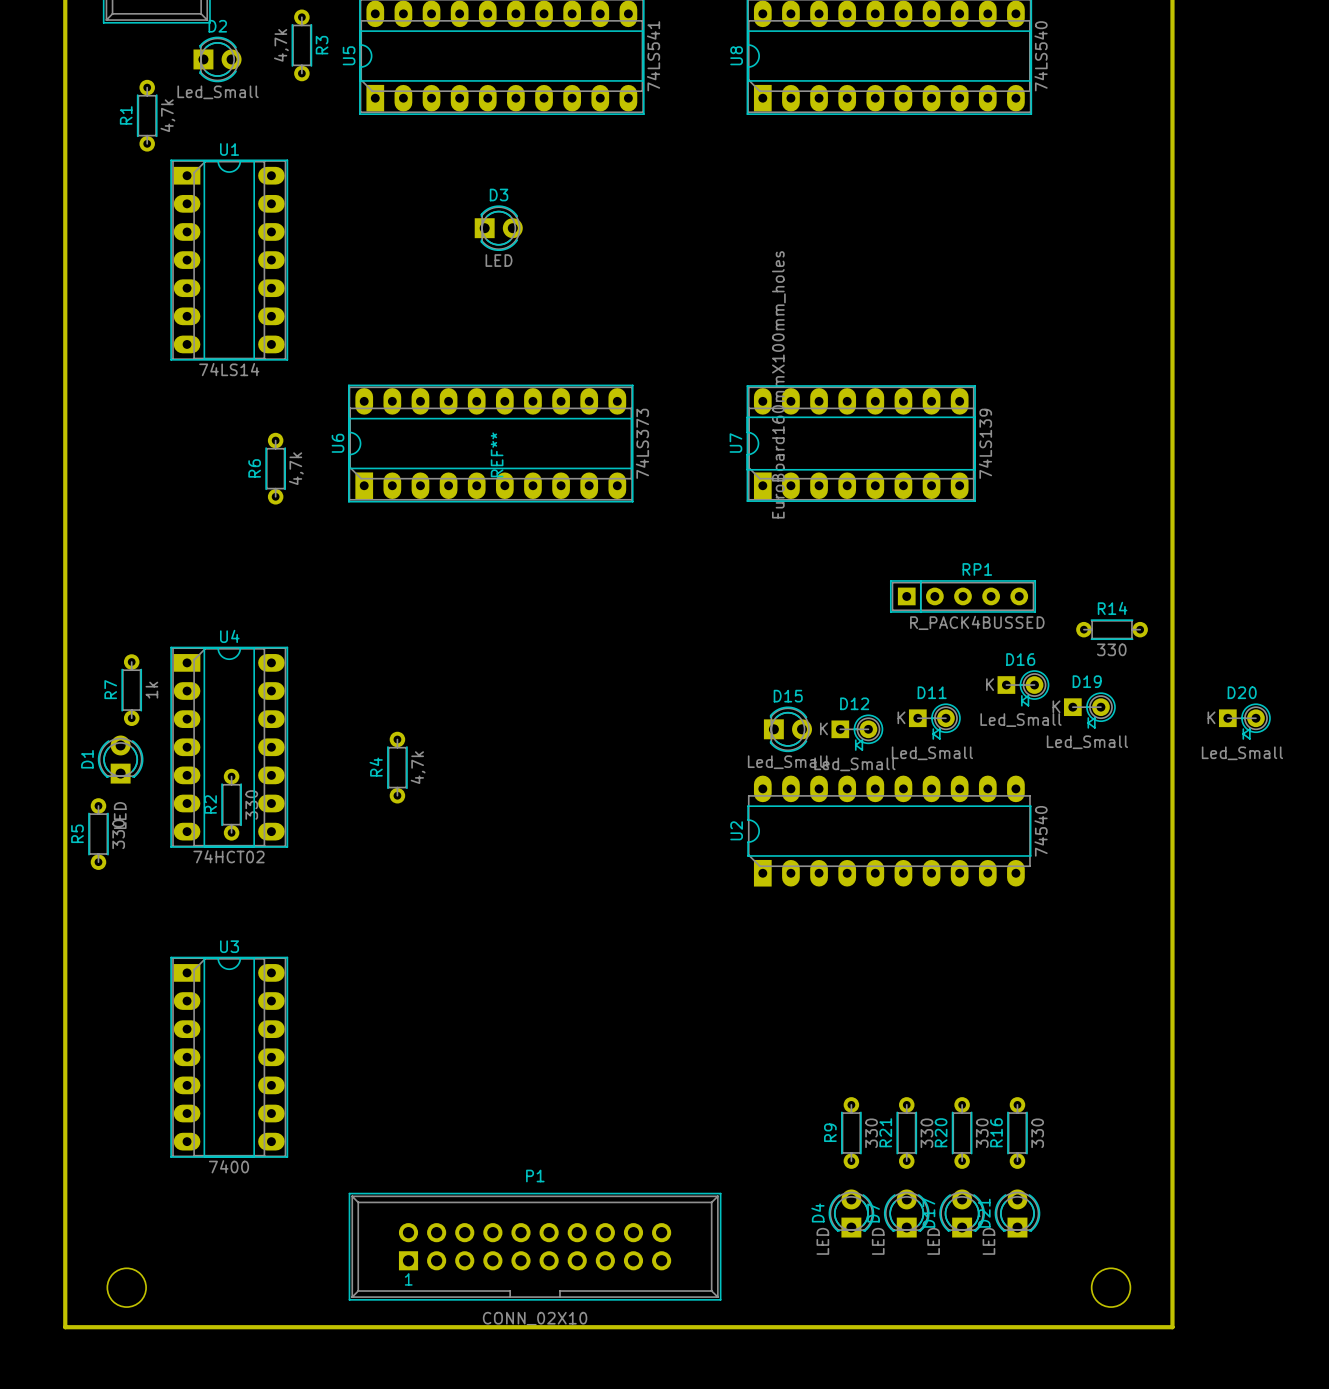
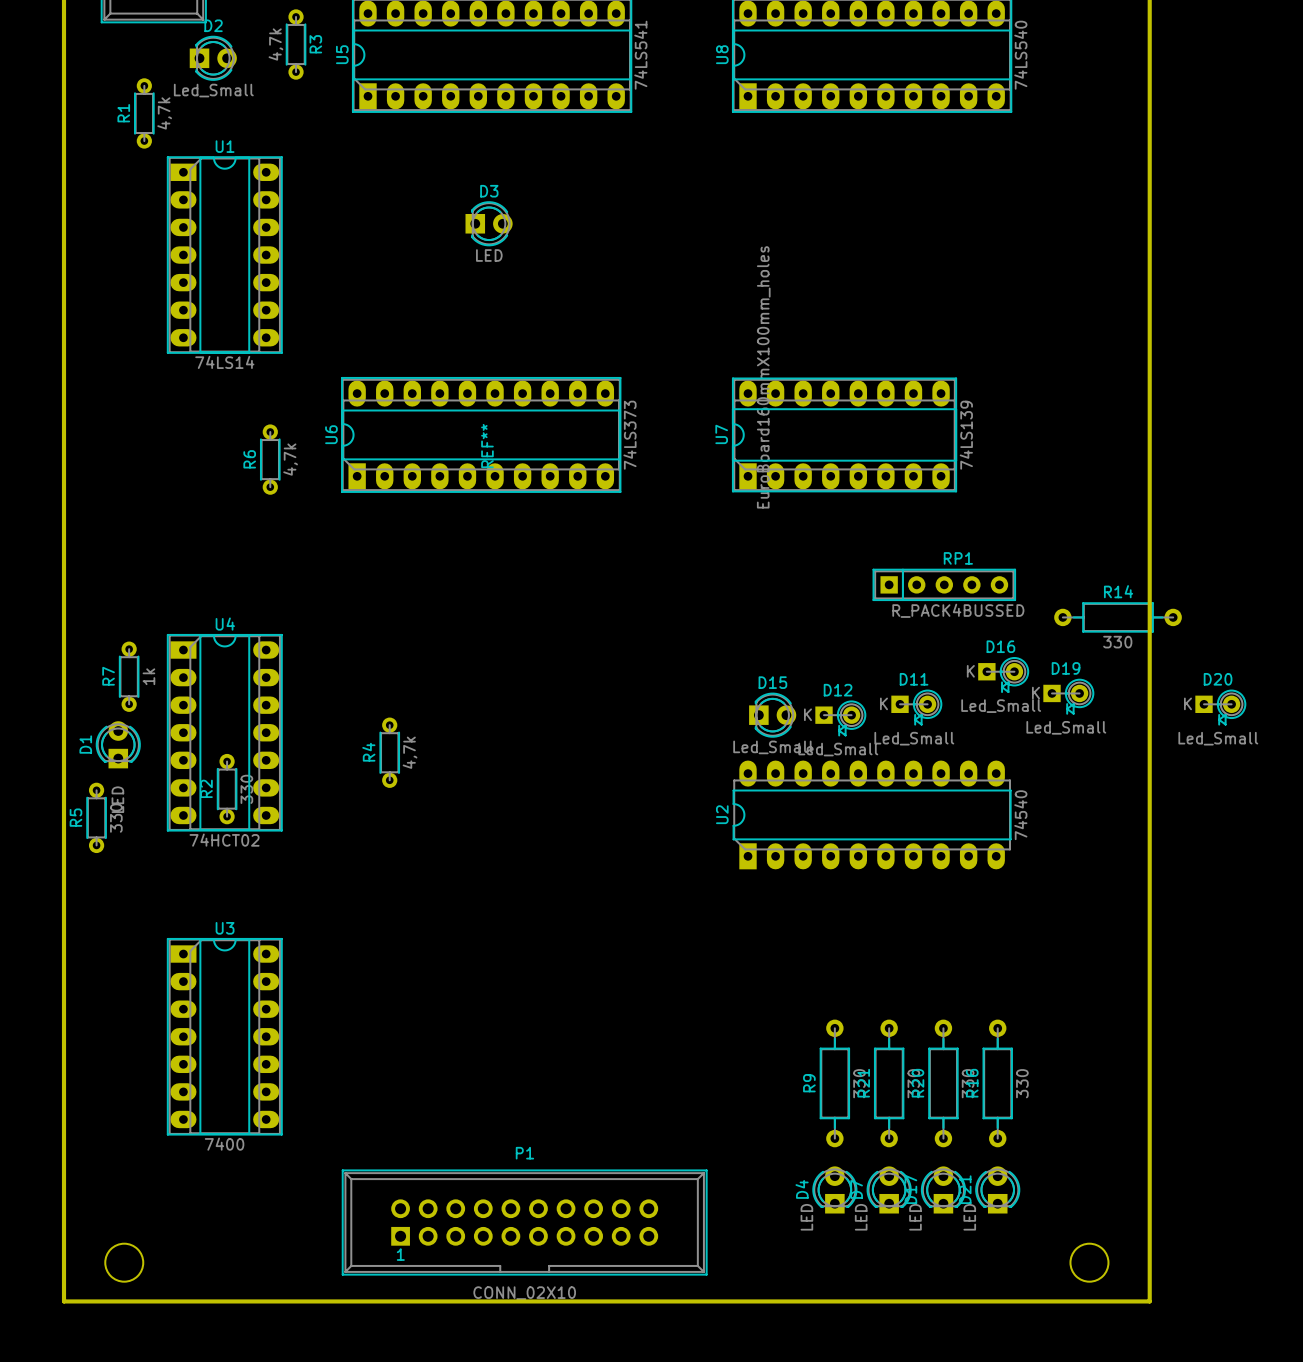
R14 footprint: [1076, 619, 1148, 640] -> [1054, 602, 1182, 633]
R9 footprint: [841, 1097, 862, 1169] -> [819, 1019, 850, 1148]
R21 footprint: [896, 1097, 917, 1169] -> [874, 1019, 905, 1148]
R20 footprint: [951, 1097, 973, 1169] -> [928, 1019, 959, 1148]
R16 footprint: [1007, 1097, 1028, 1169] -> [982, 1019, 1013, 1148]

